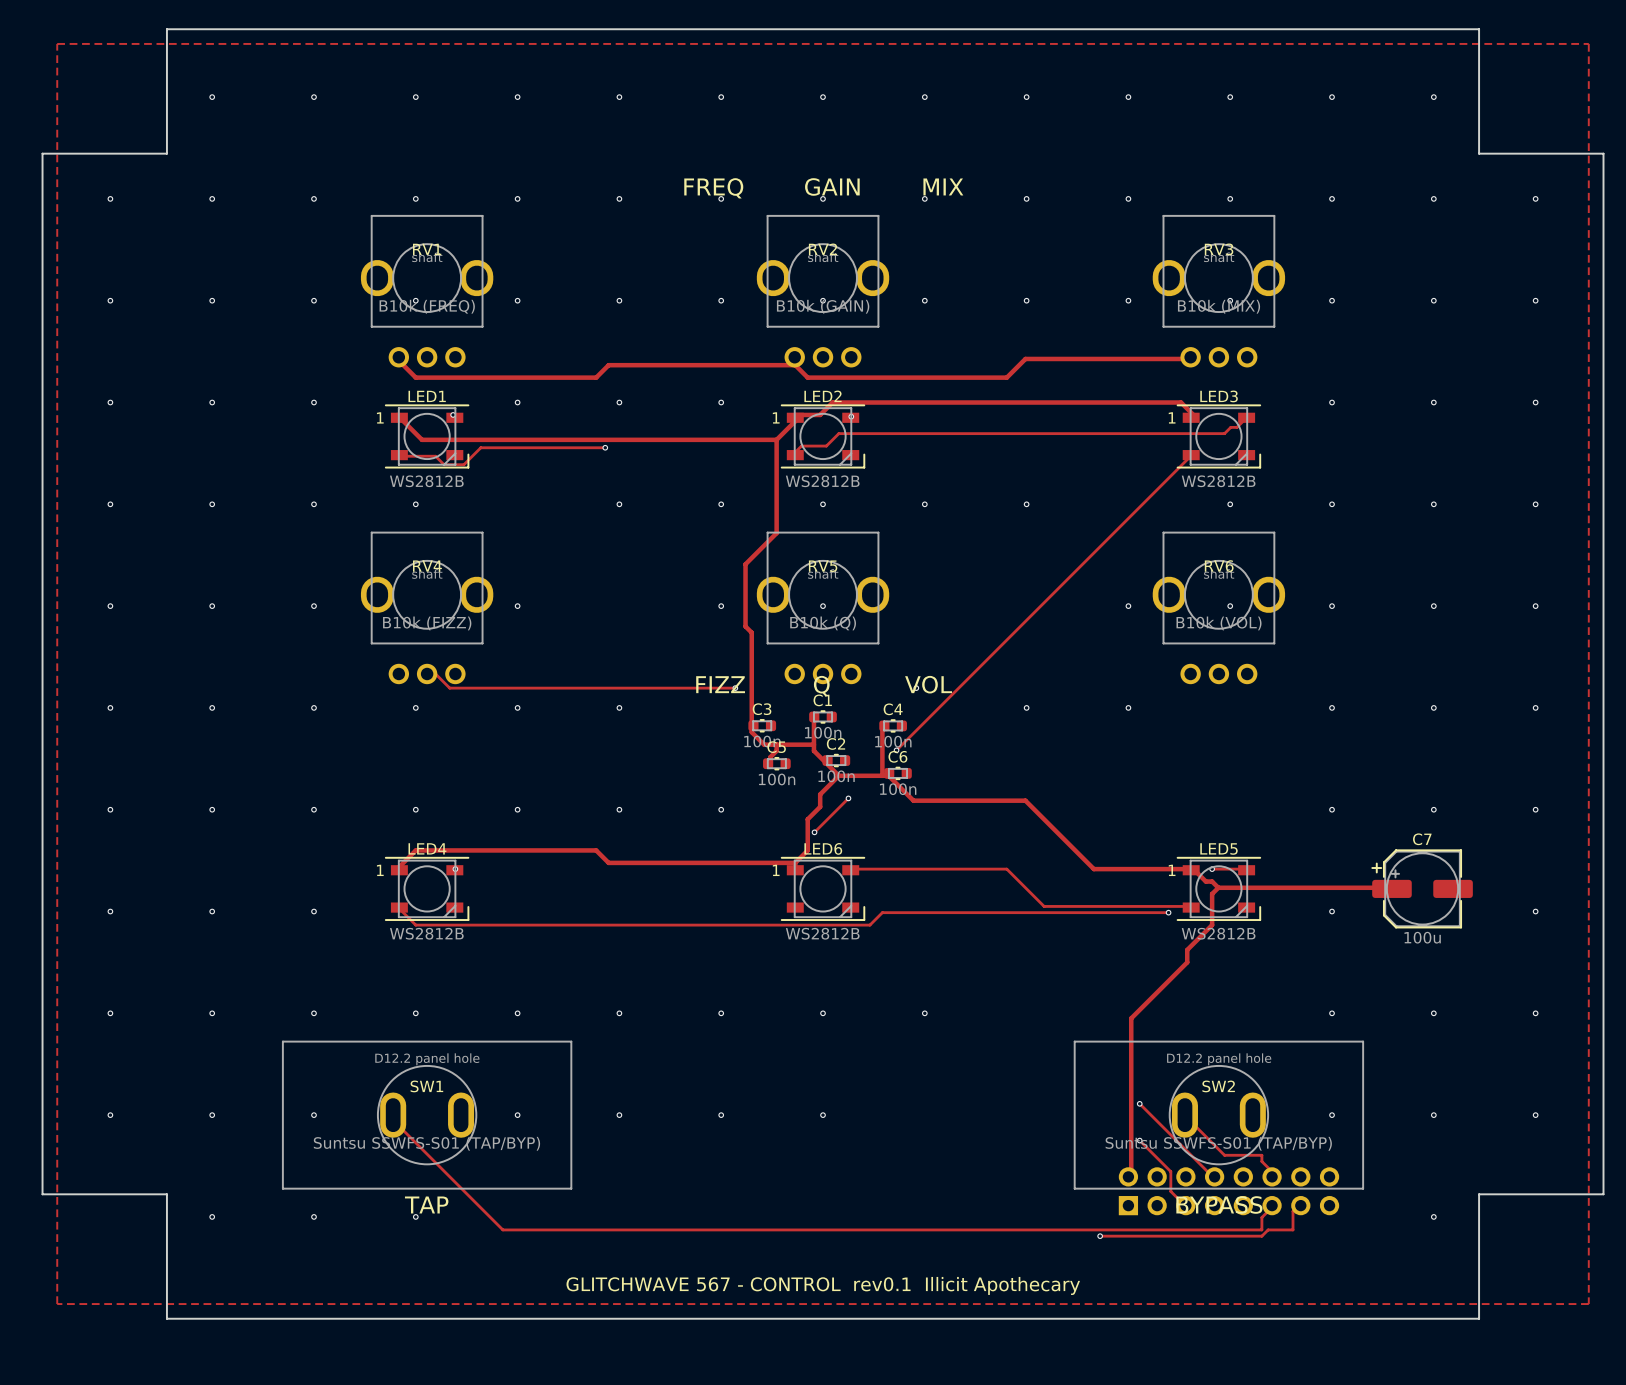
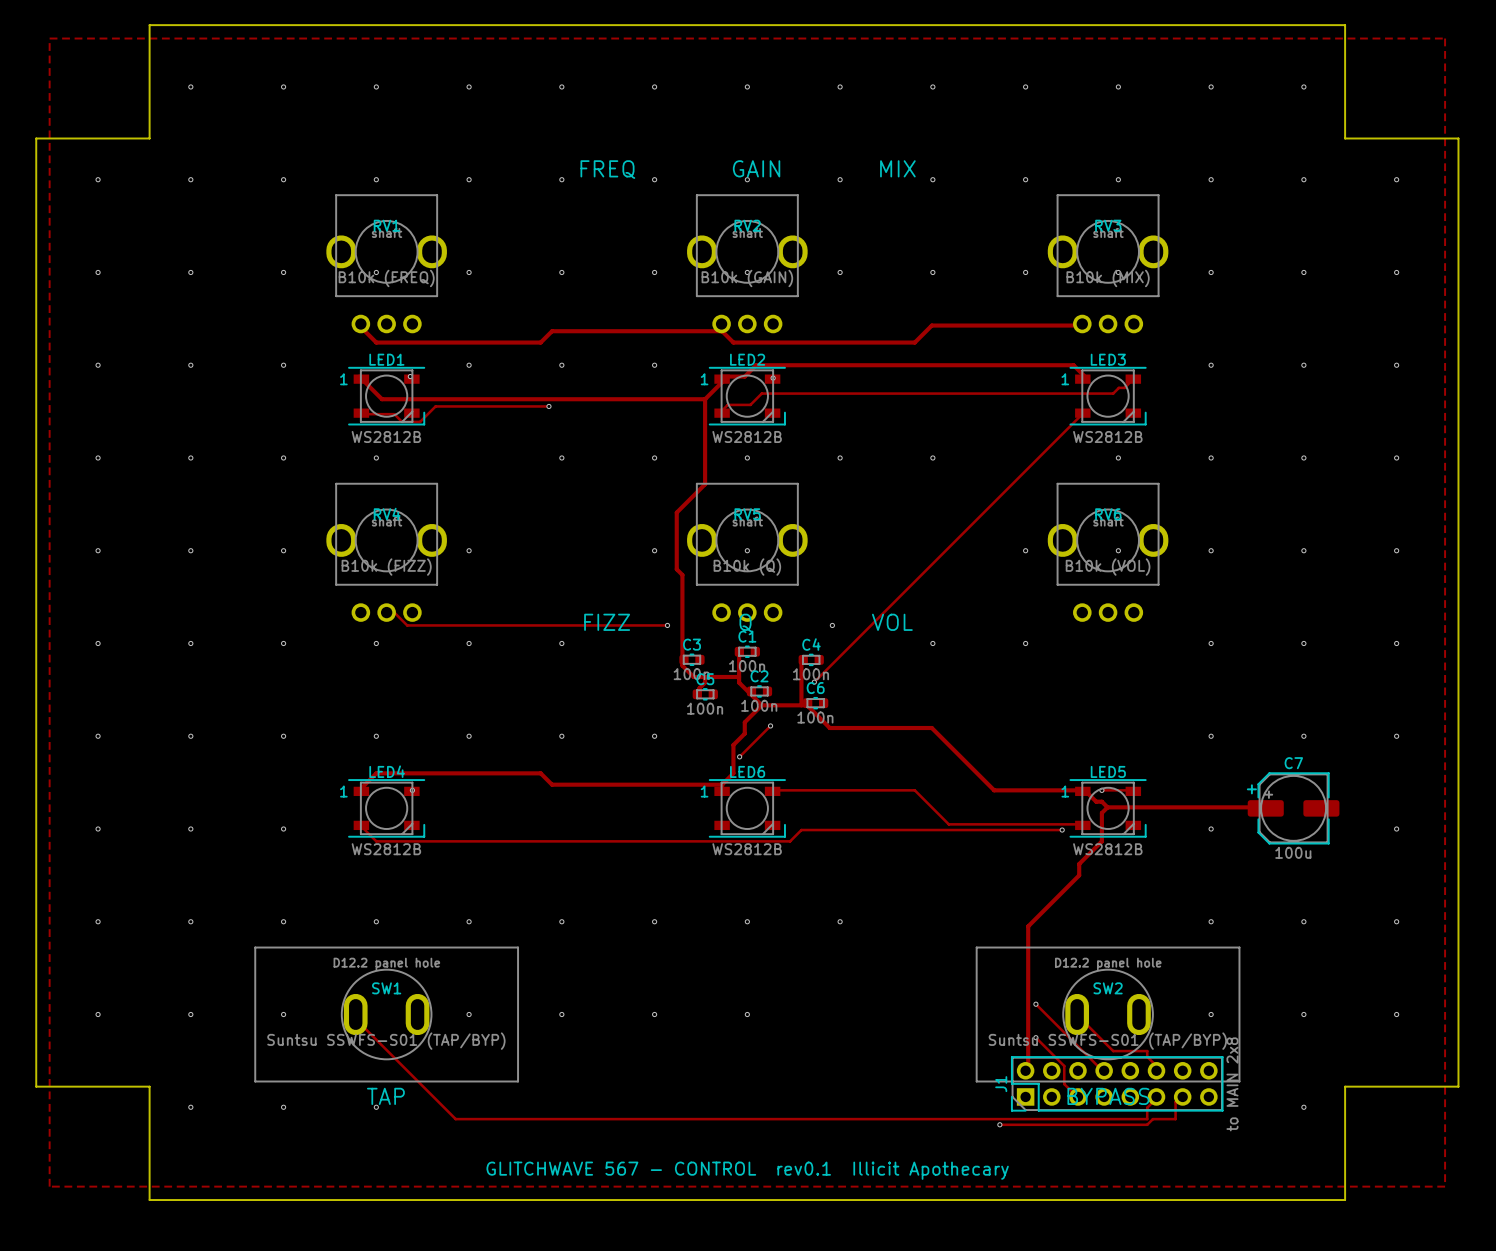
part: (1228, 1191) -> none
J1: none -> to MAIN 2x8 (1117, 1083)

